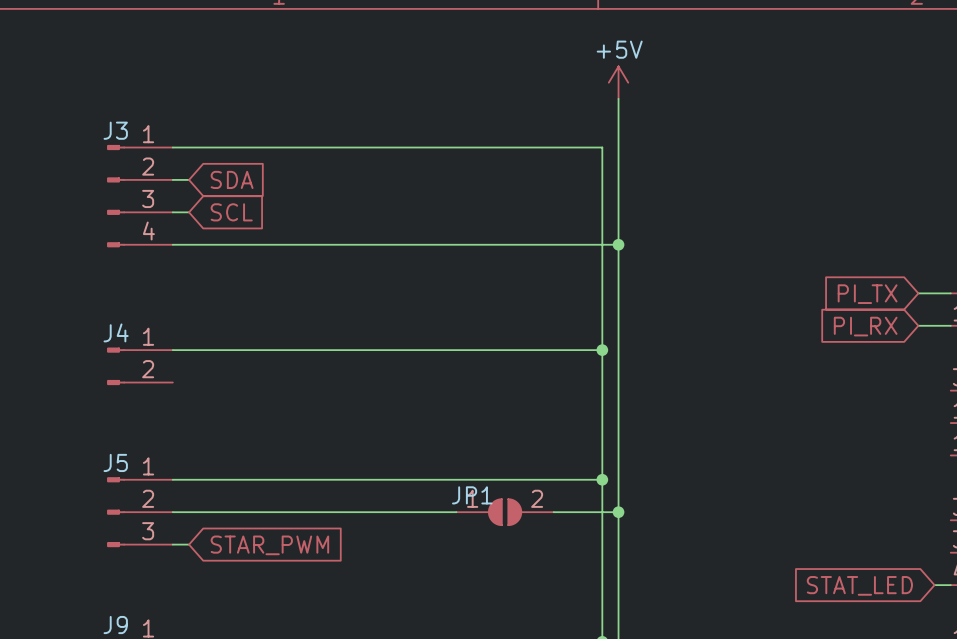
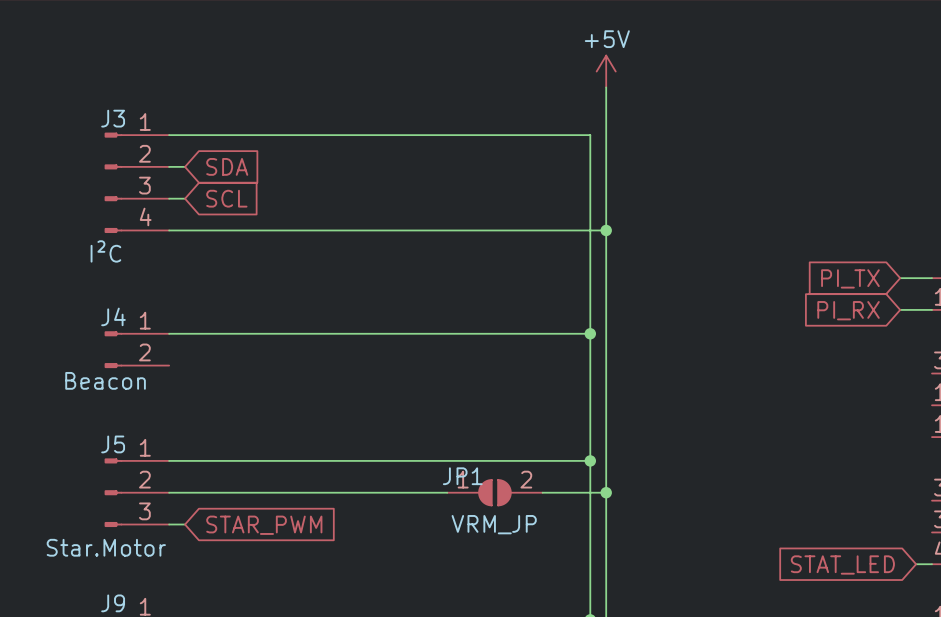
J3 value: none -> I²C (105, 251)
J4 value: none -> Beacon (105, 380)
JP1 value: none -> VRM_JP (494, 524)
J5 value: none -> Star.Motor (106, 547)

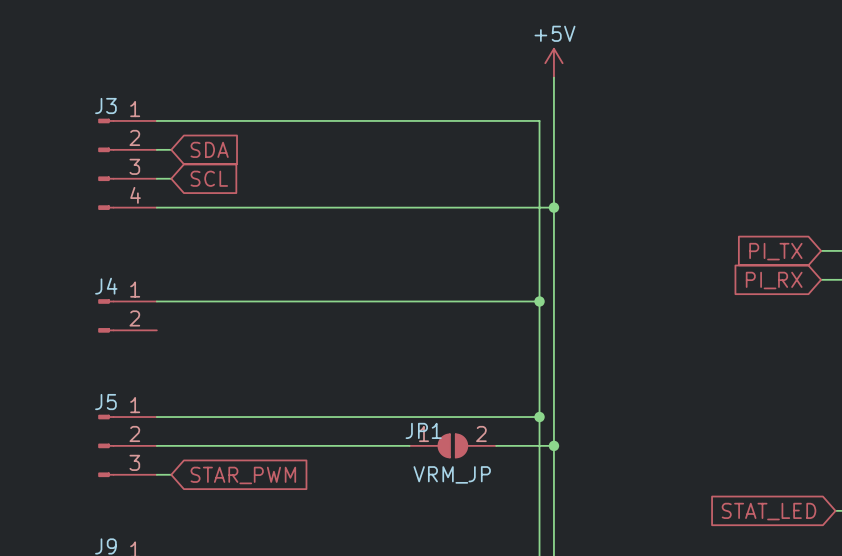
J3 value: I²C (105, 251) -> none
J4 value: Beacon (105, 380) -> none
J5 value: Star.Motor (106, 547) -> none

